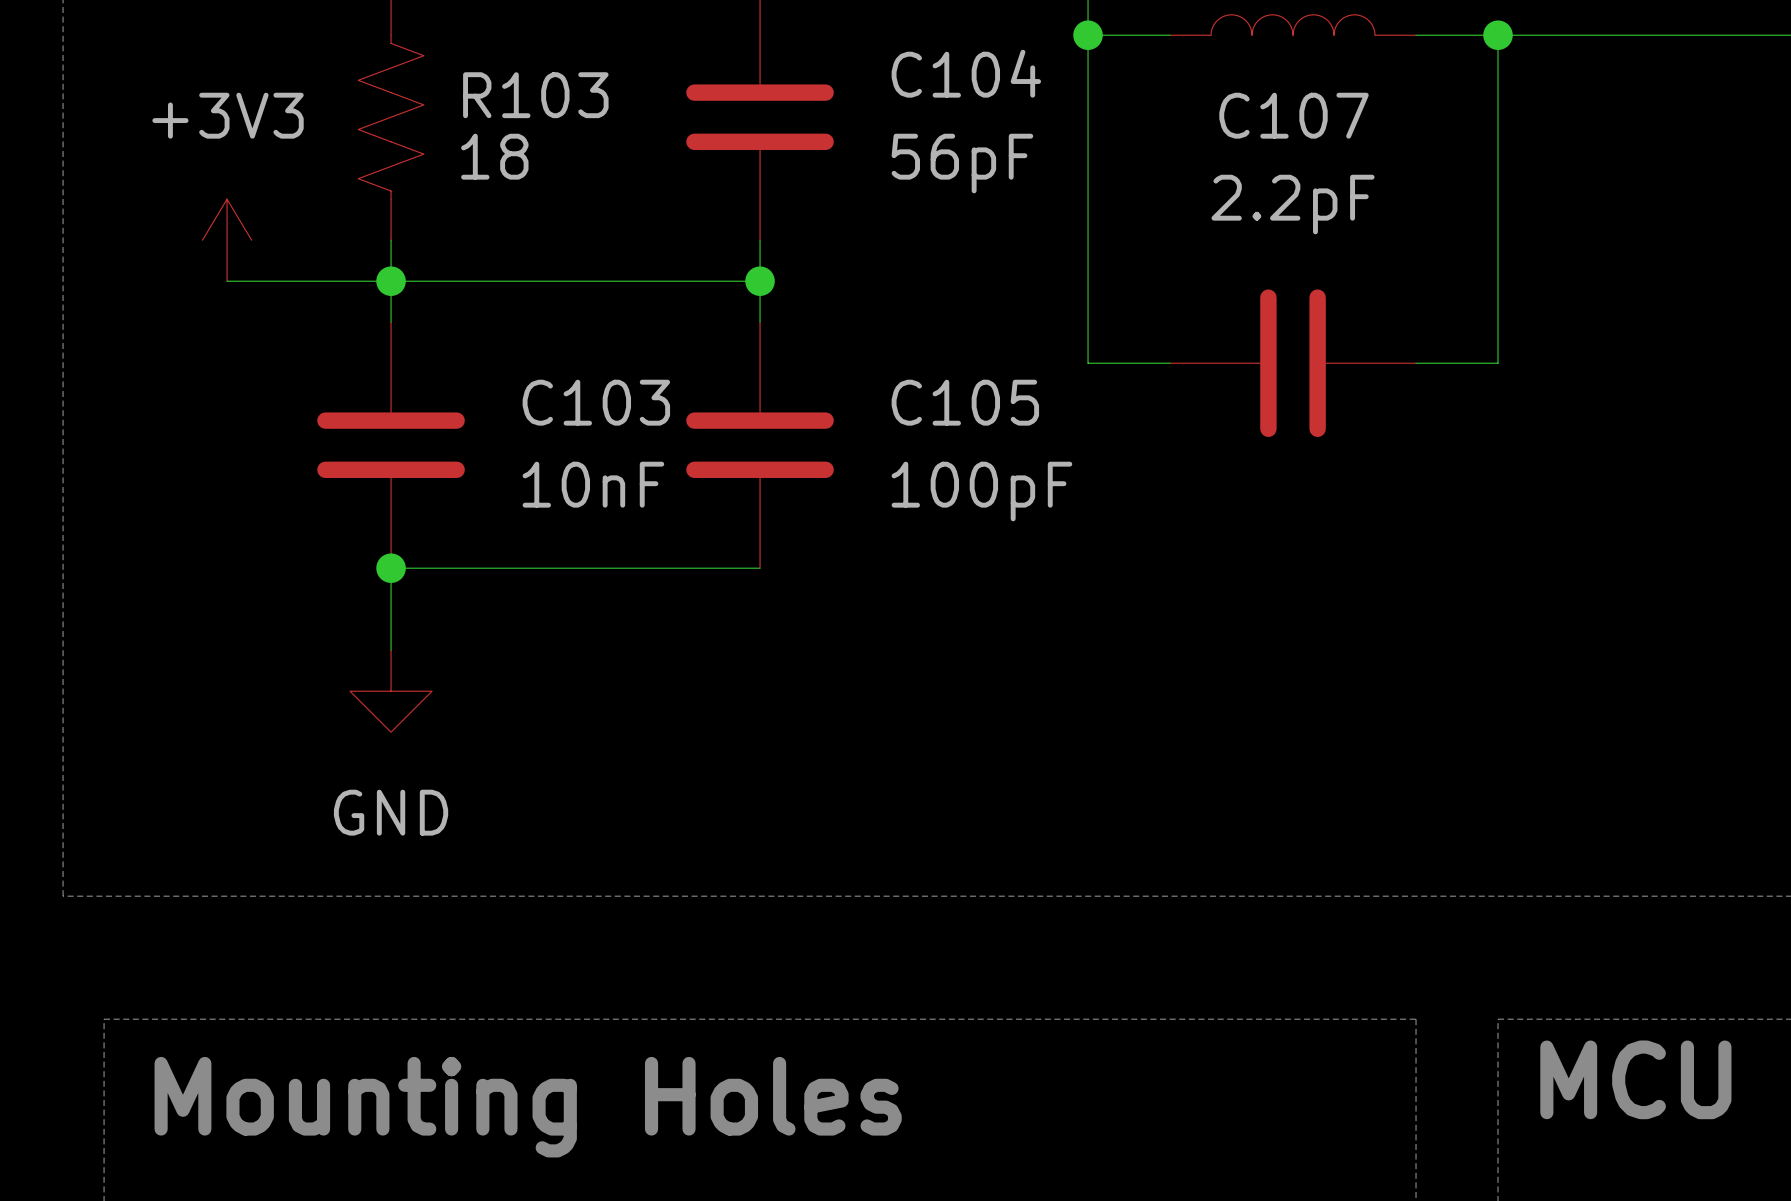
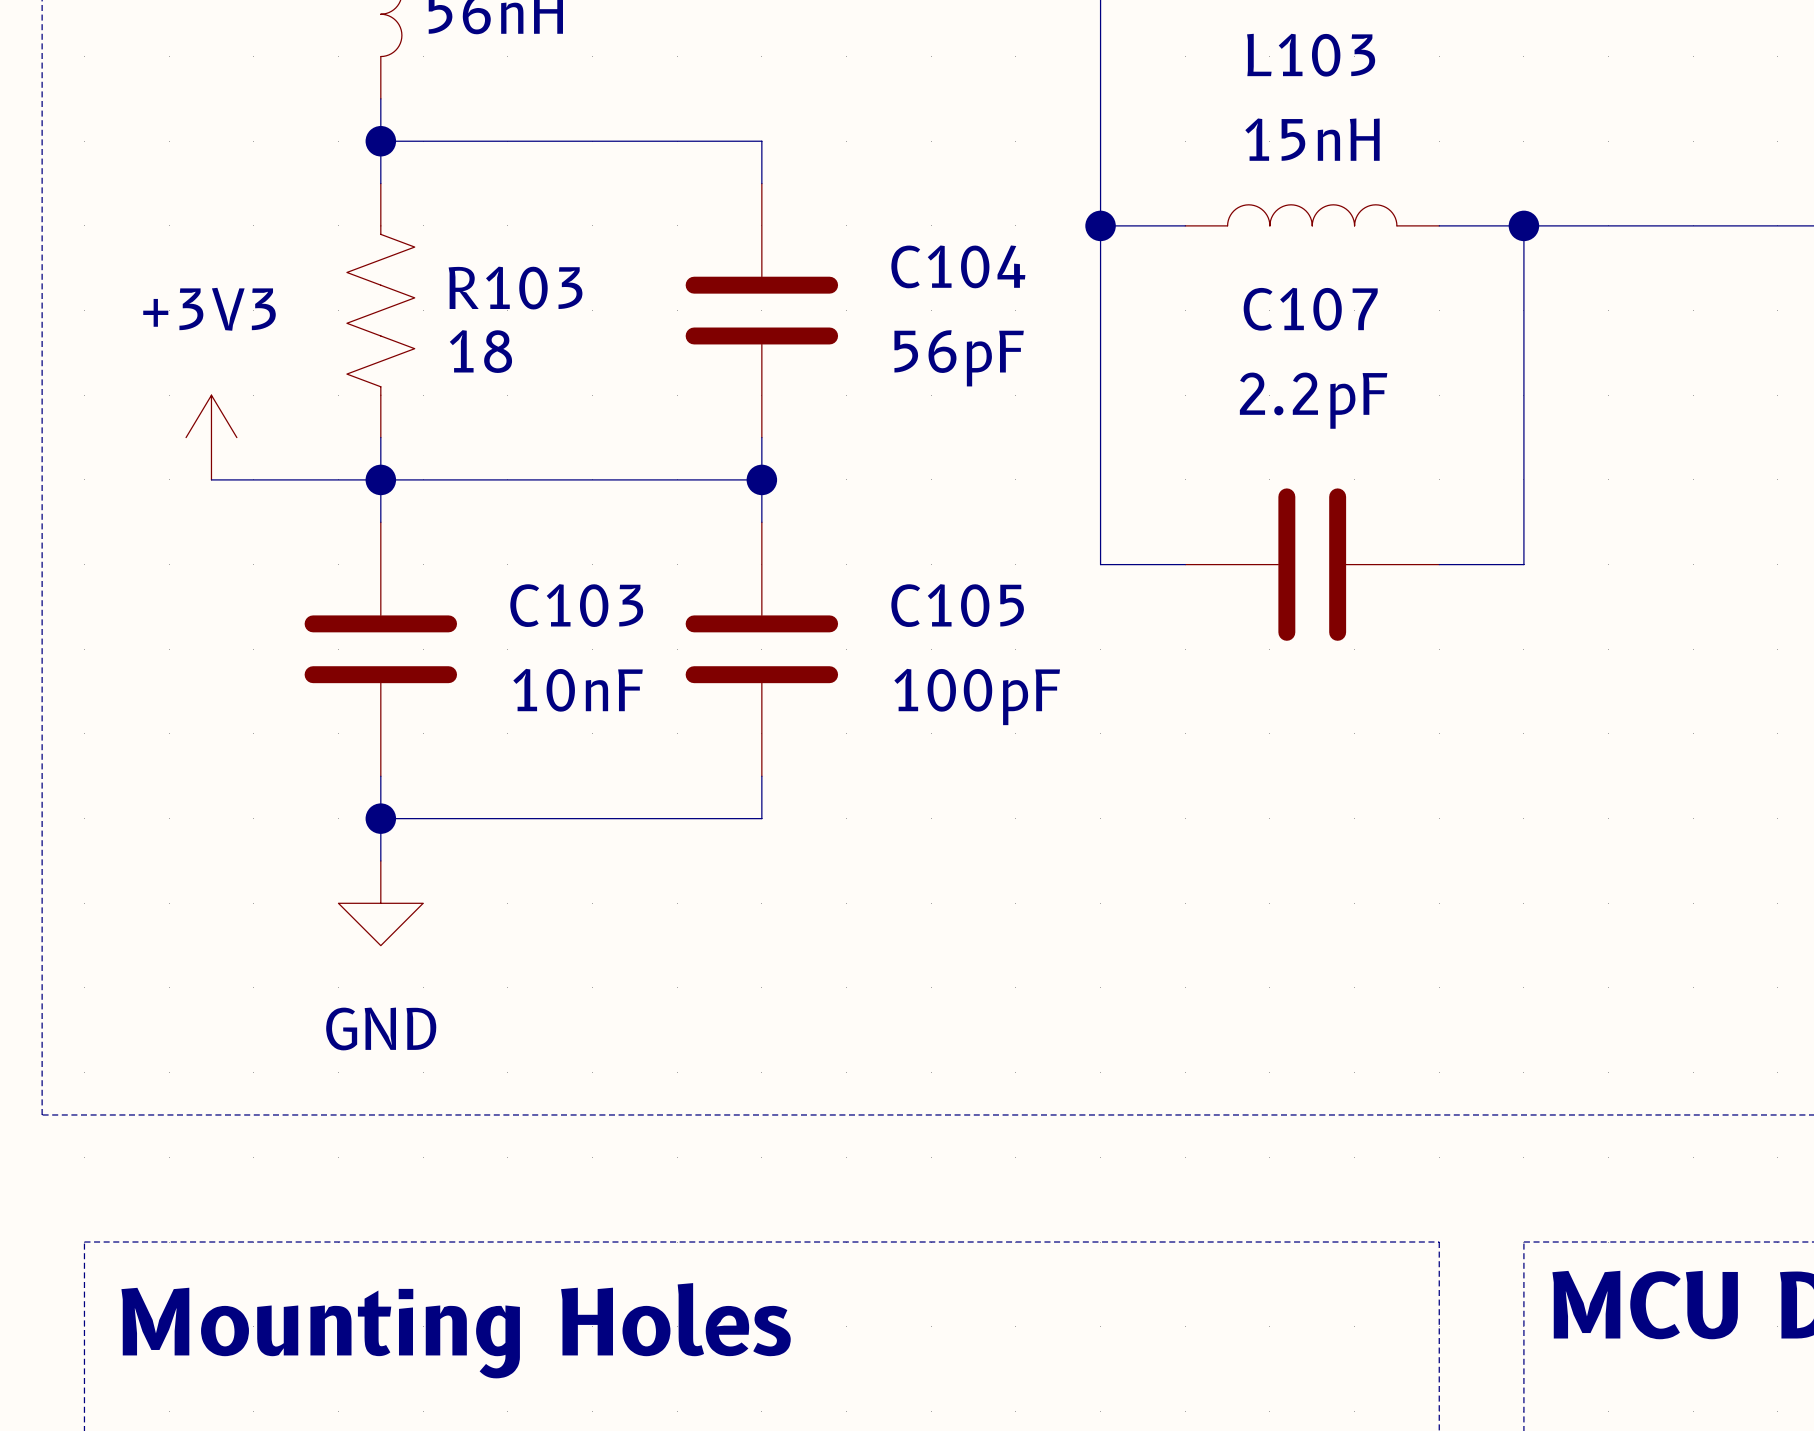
wire: (391, 568) (760, 568) -> (380, 818) (761, 818) (761, 776)
junction position: (391, 568) -> (380, 818)

